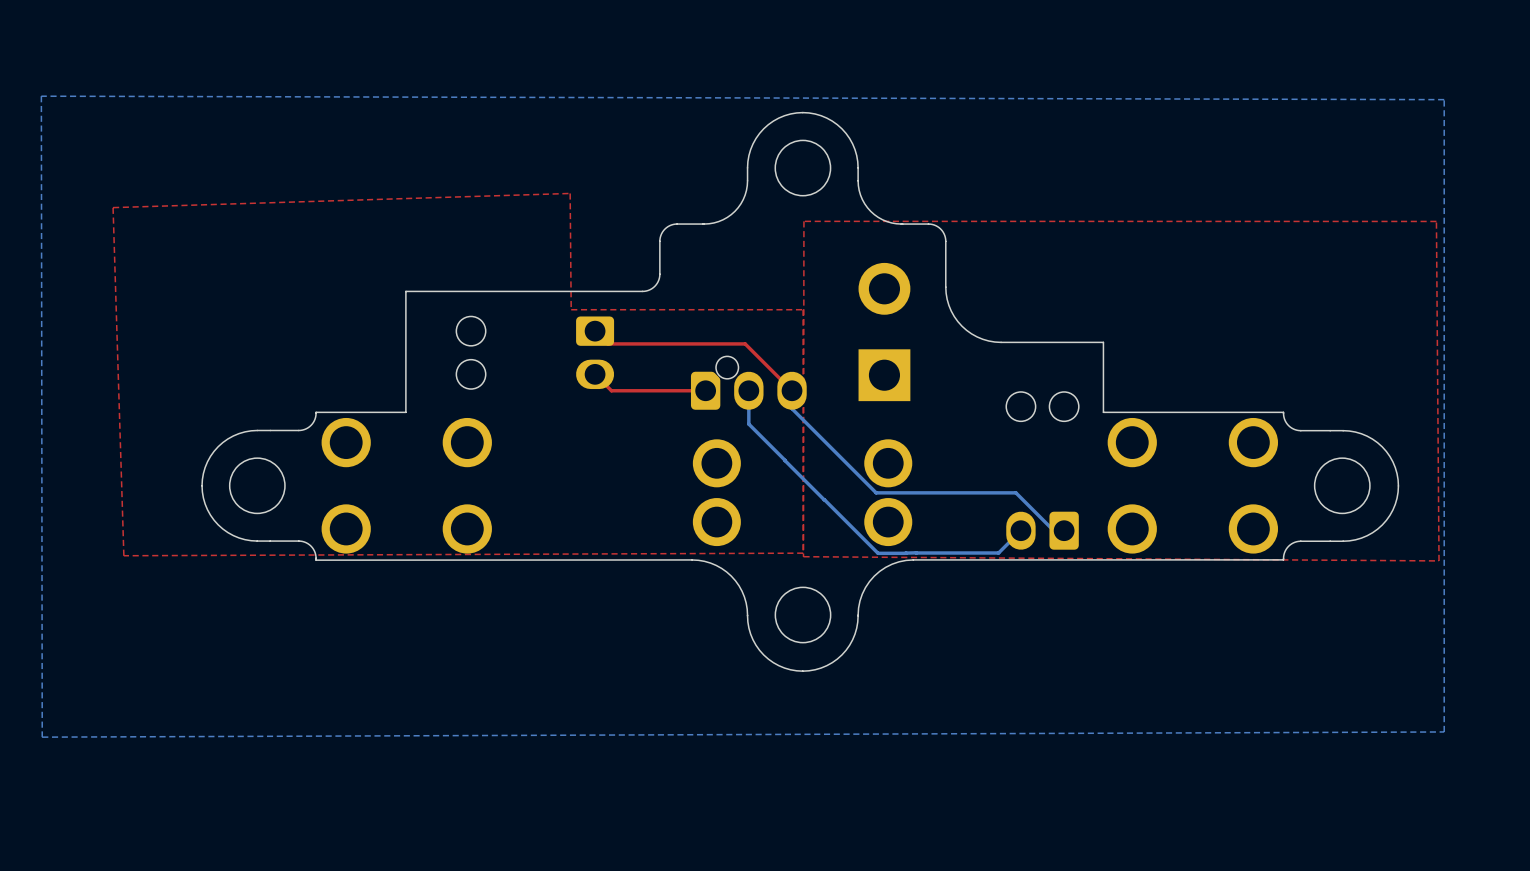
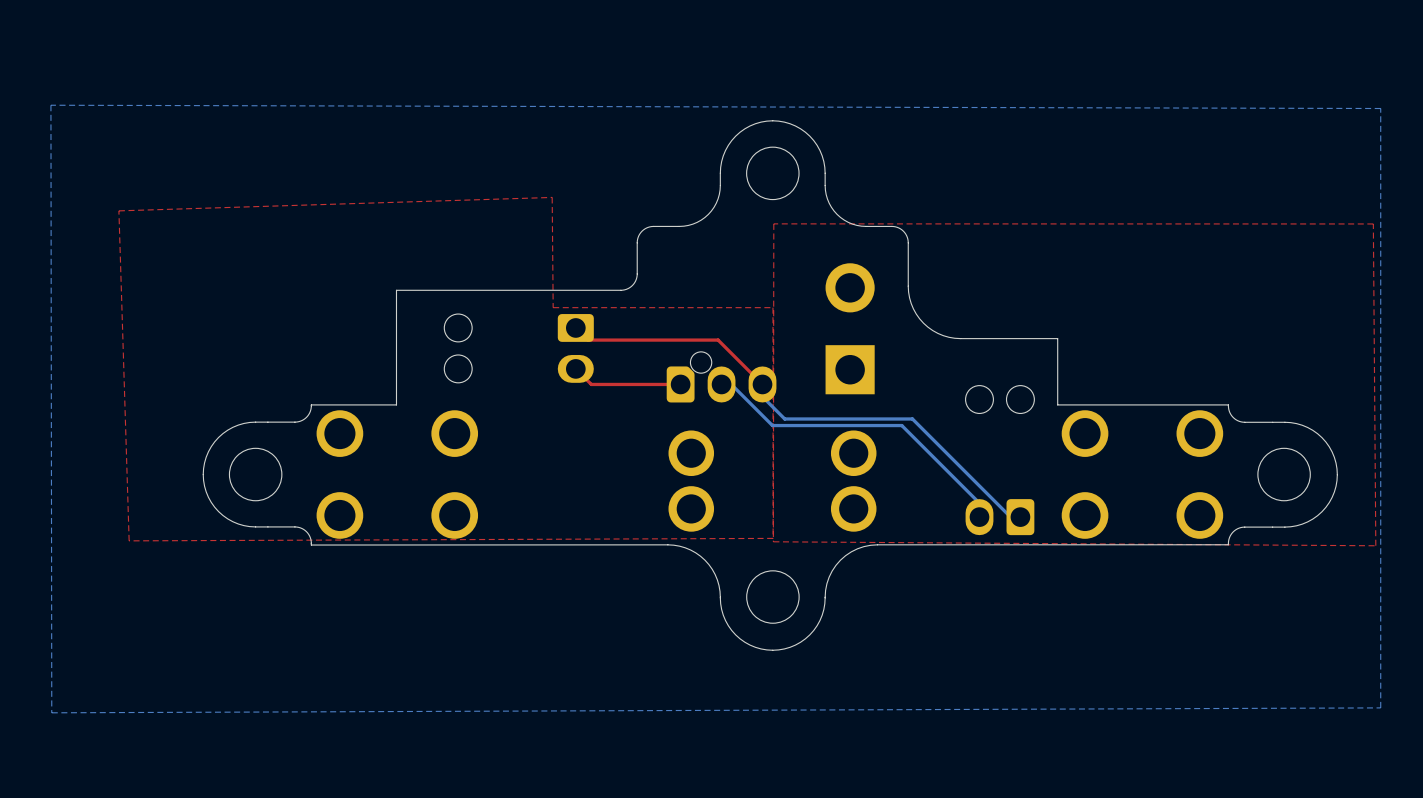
bottom track: (748, 390) (748, 424) (785, 460) -> (721, 384) (731, 384) (772, 425) (901, 425) (979, 503)
bottom track: (792, 403) (792, 408) (876, 492) (1015, 492) -> (762, 396) (784, 418) (912, 418) (974, 481)
bottom track: (785, 460) (824, 499) -> none
bottom track: (824, 499) (878, 553) (916, 552) -> none
bottom track: (1020, 530) (998, 552) (916, 553) -> none

